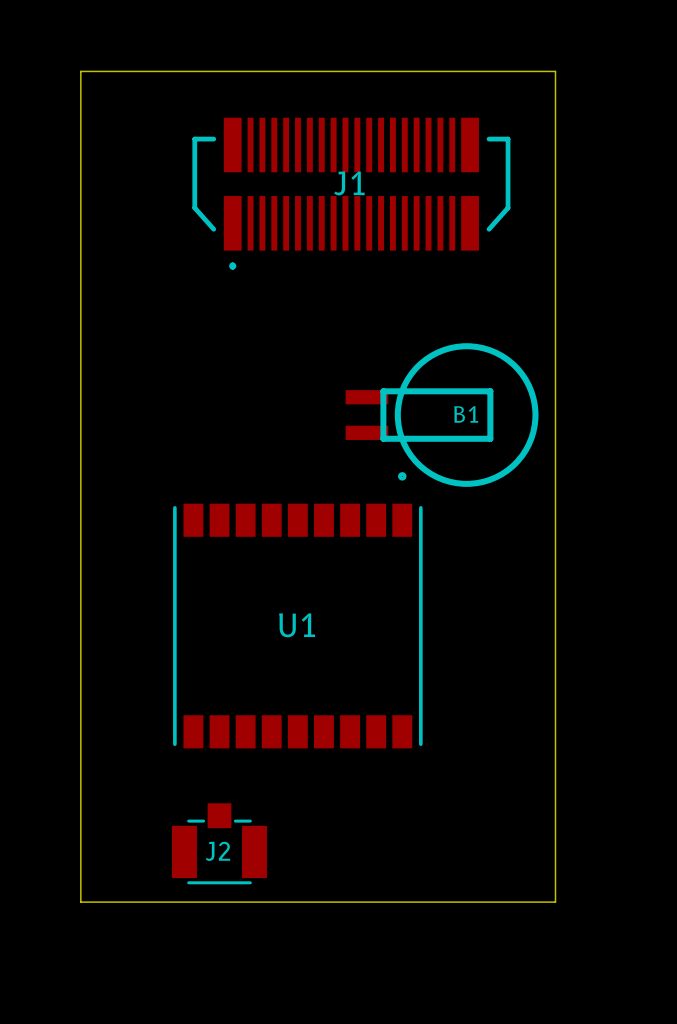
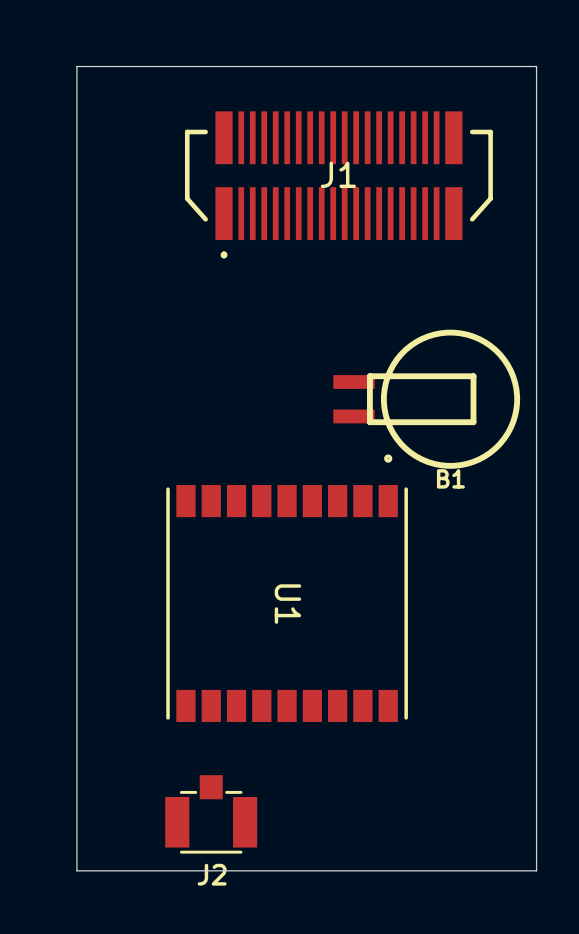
B1 name position: B1 (466, 414) -> B1 (450, 478)
U1 name rotation: 0° (297, 625) -> 90° clockwise (287, 604)
J2 name position: J2 (217, 851) -> J2 (212, 874)

